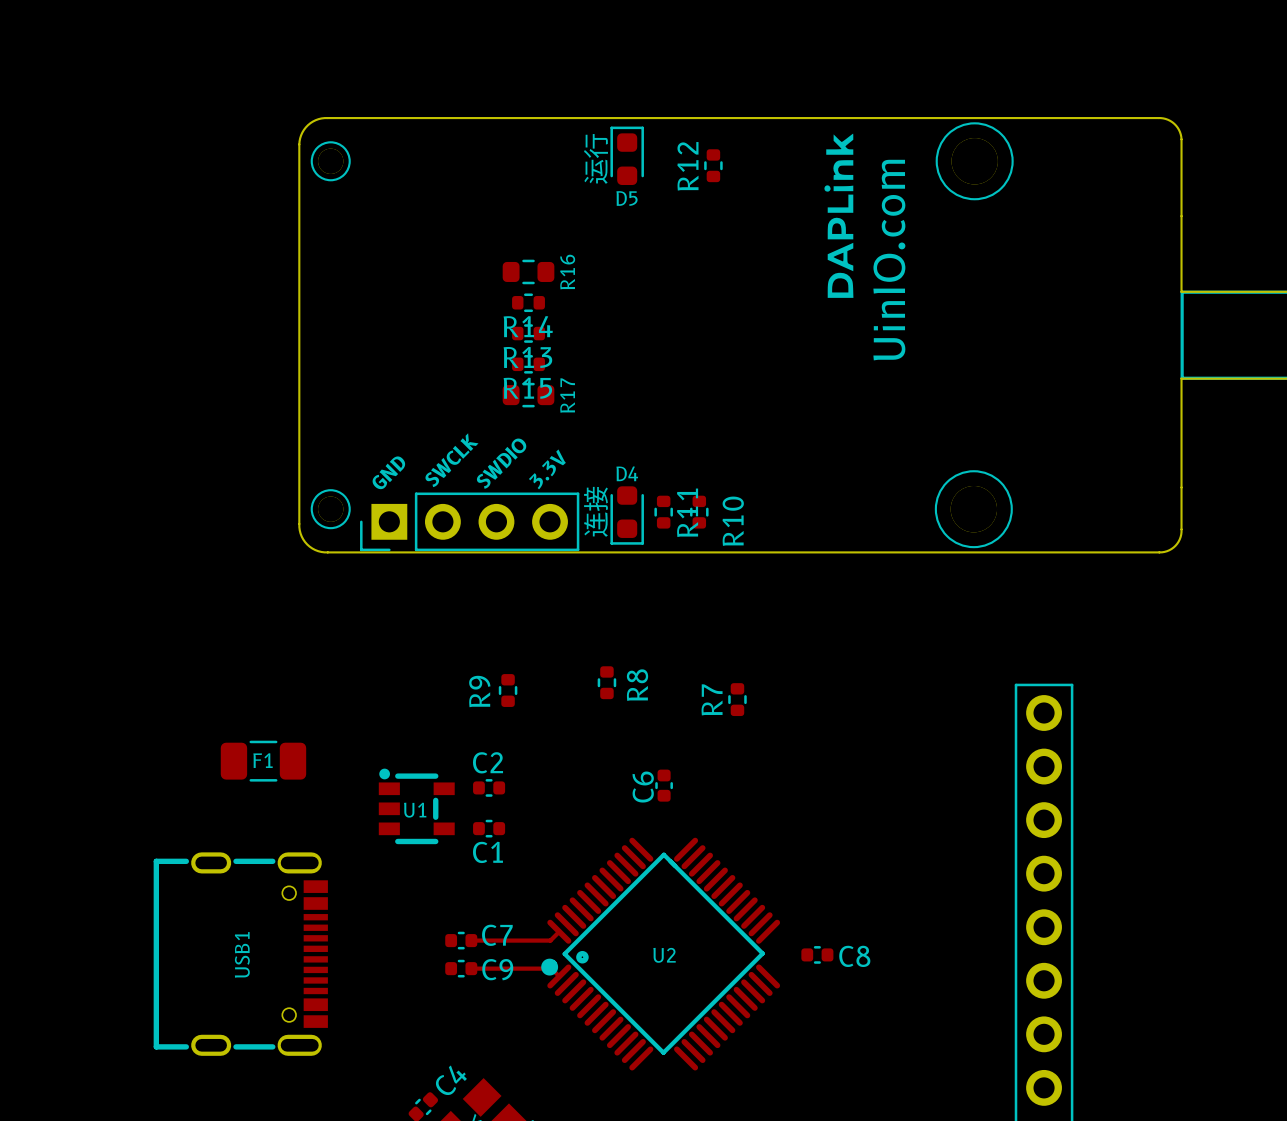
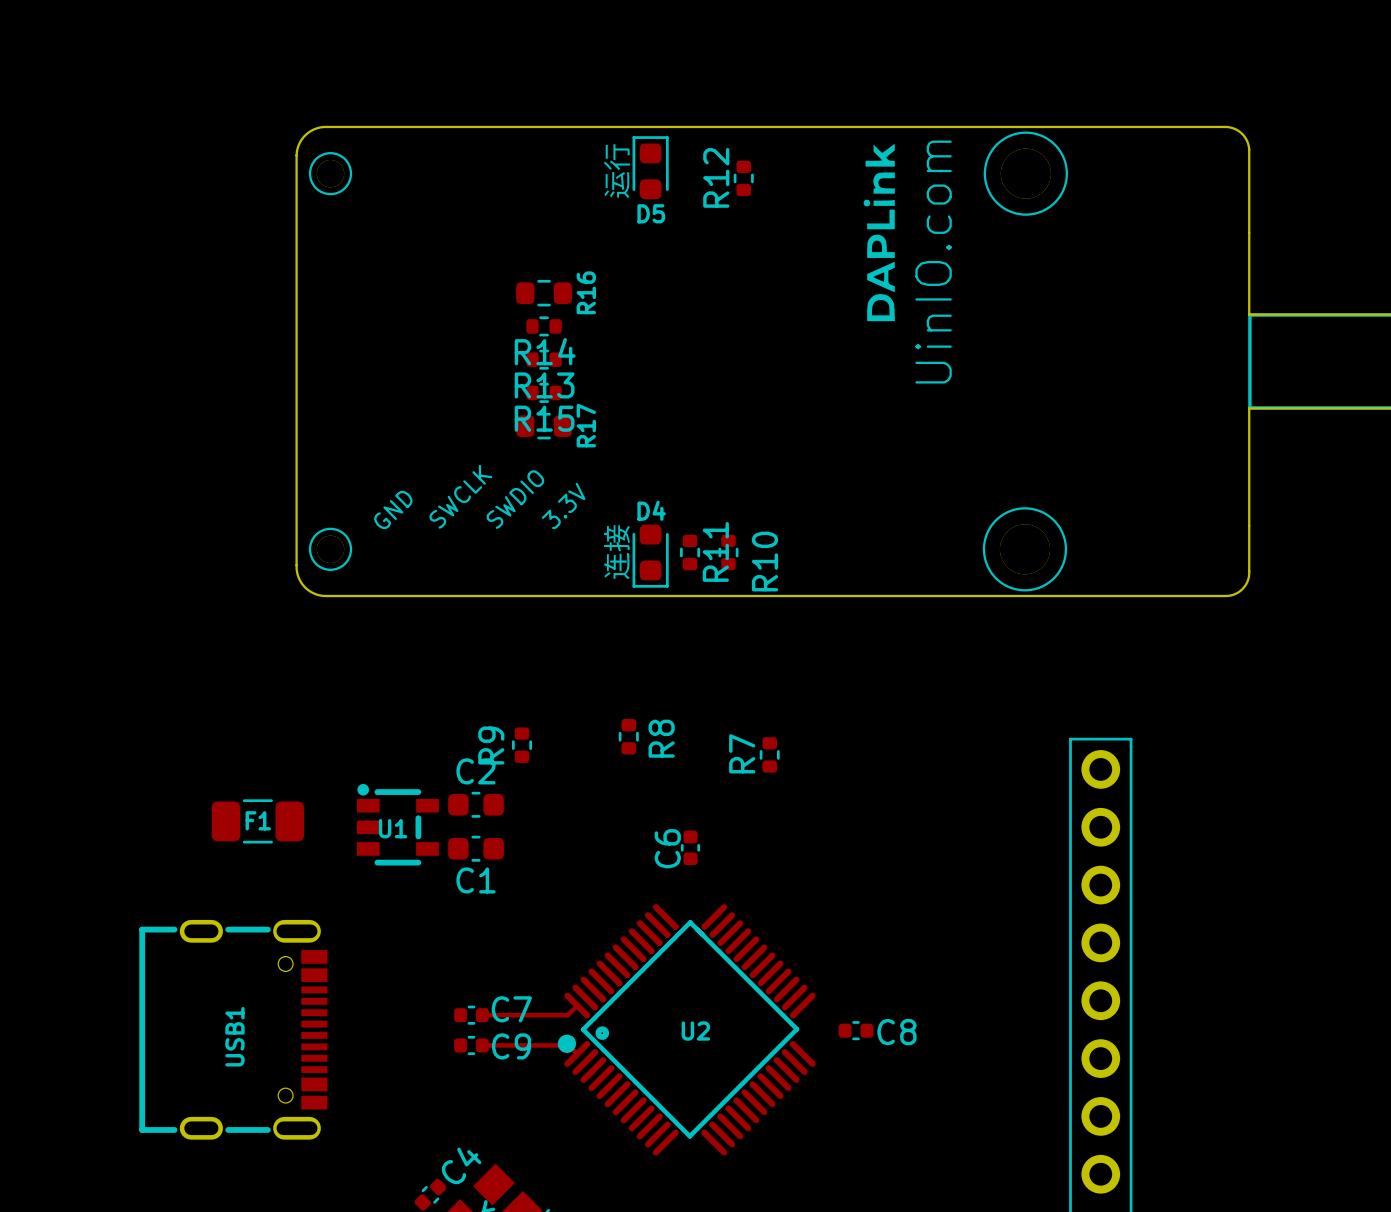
part: (469, 521) -> none
C2 footprint: [473, 779, 506, 797] -> [448, 791, 504, 818]
U1 position: (416, 806) -> (397, 824)
C1 footprint: [473, 819, 506, 838] -> [448, 835, 504, 862]

